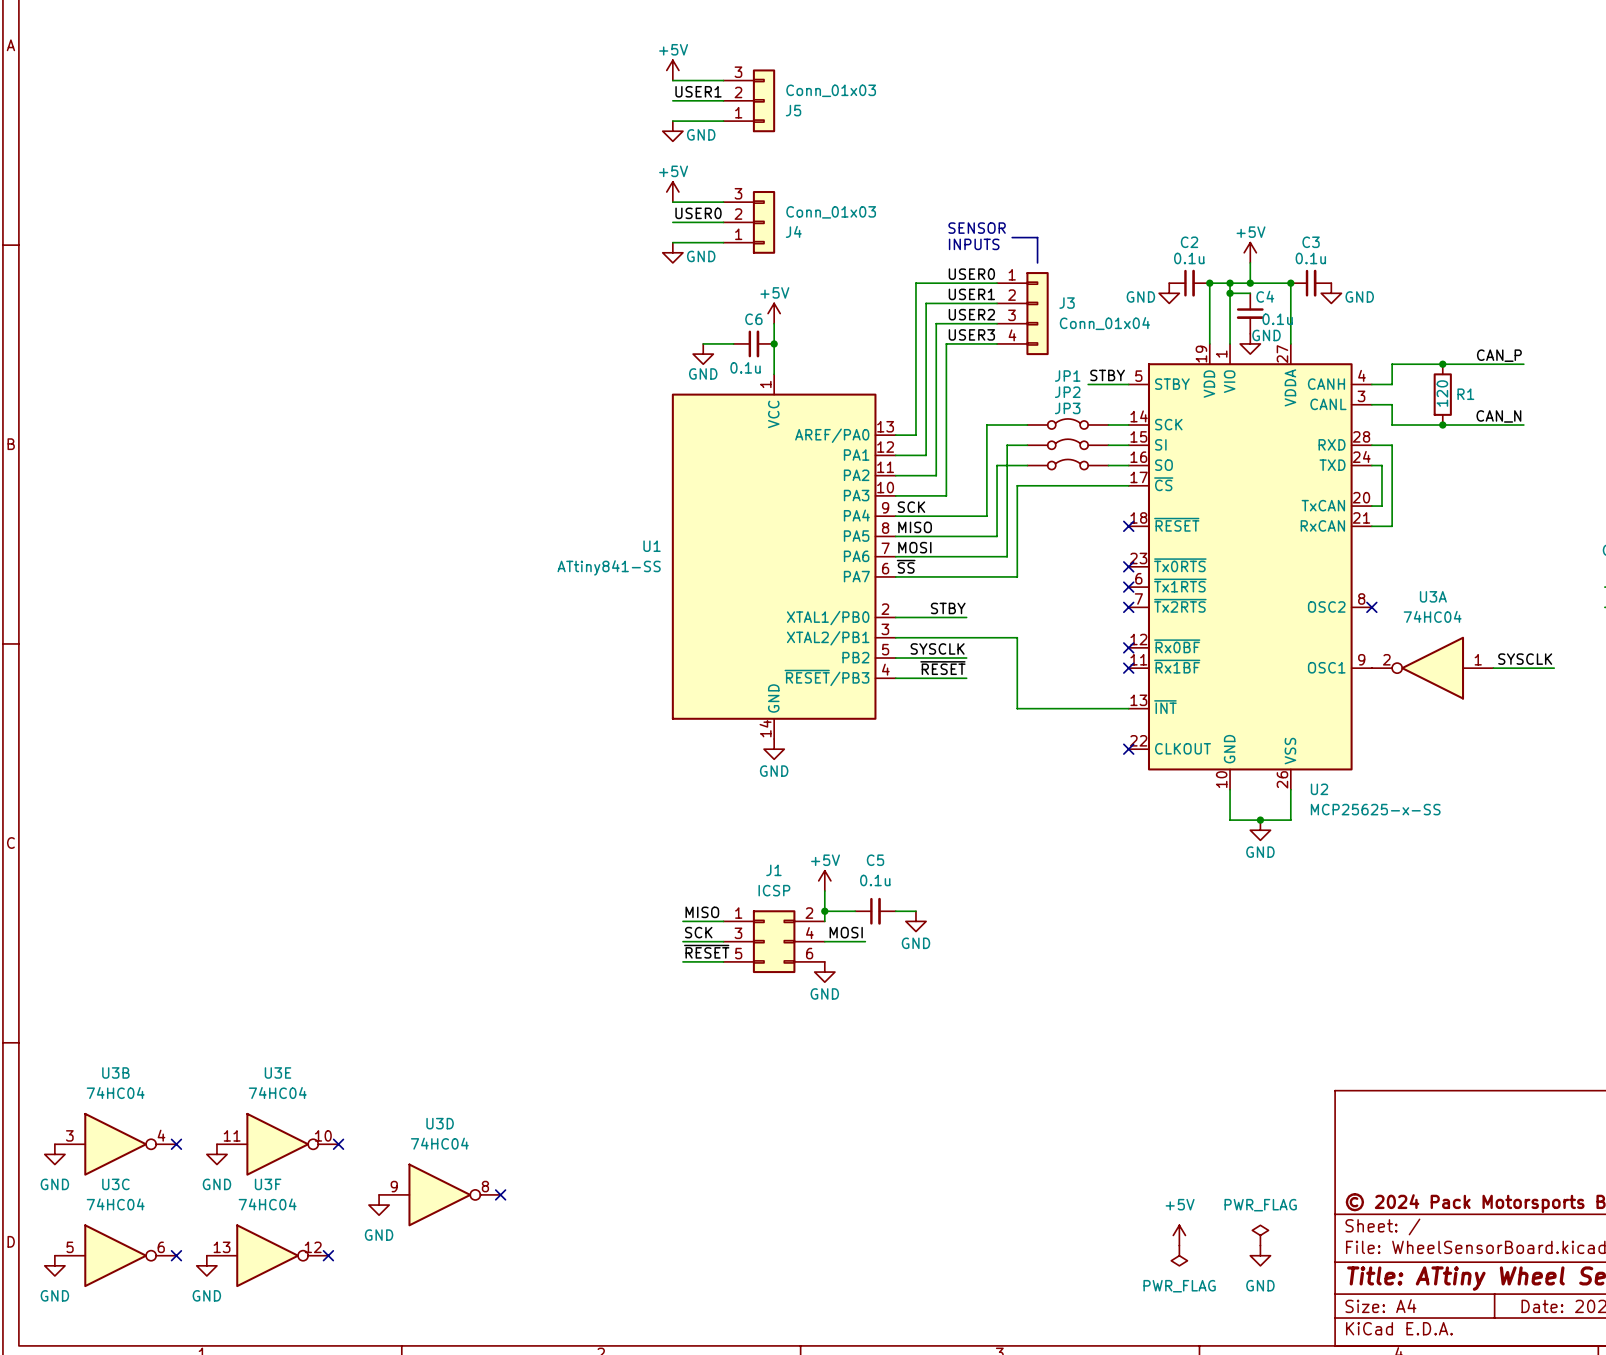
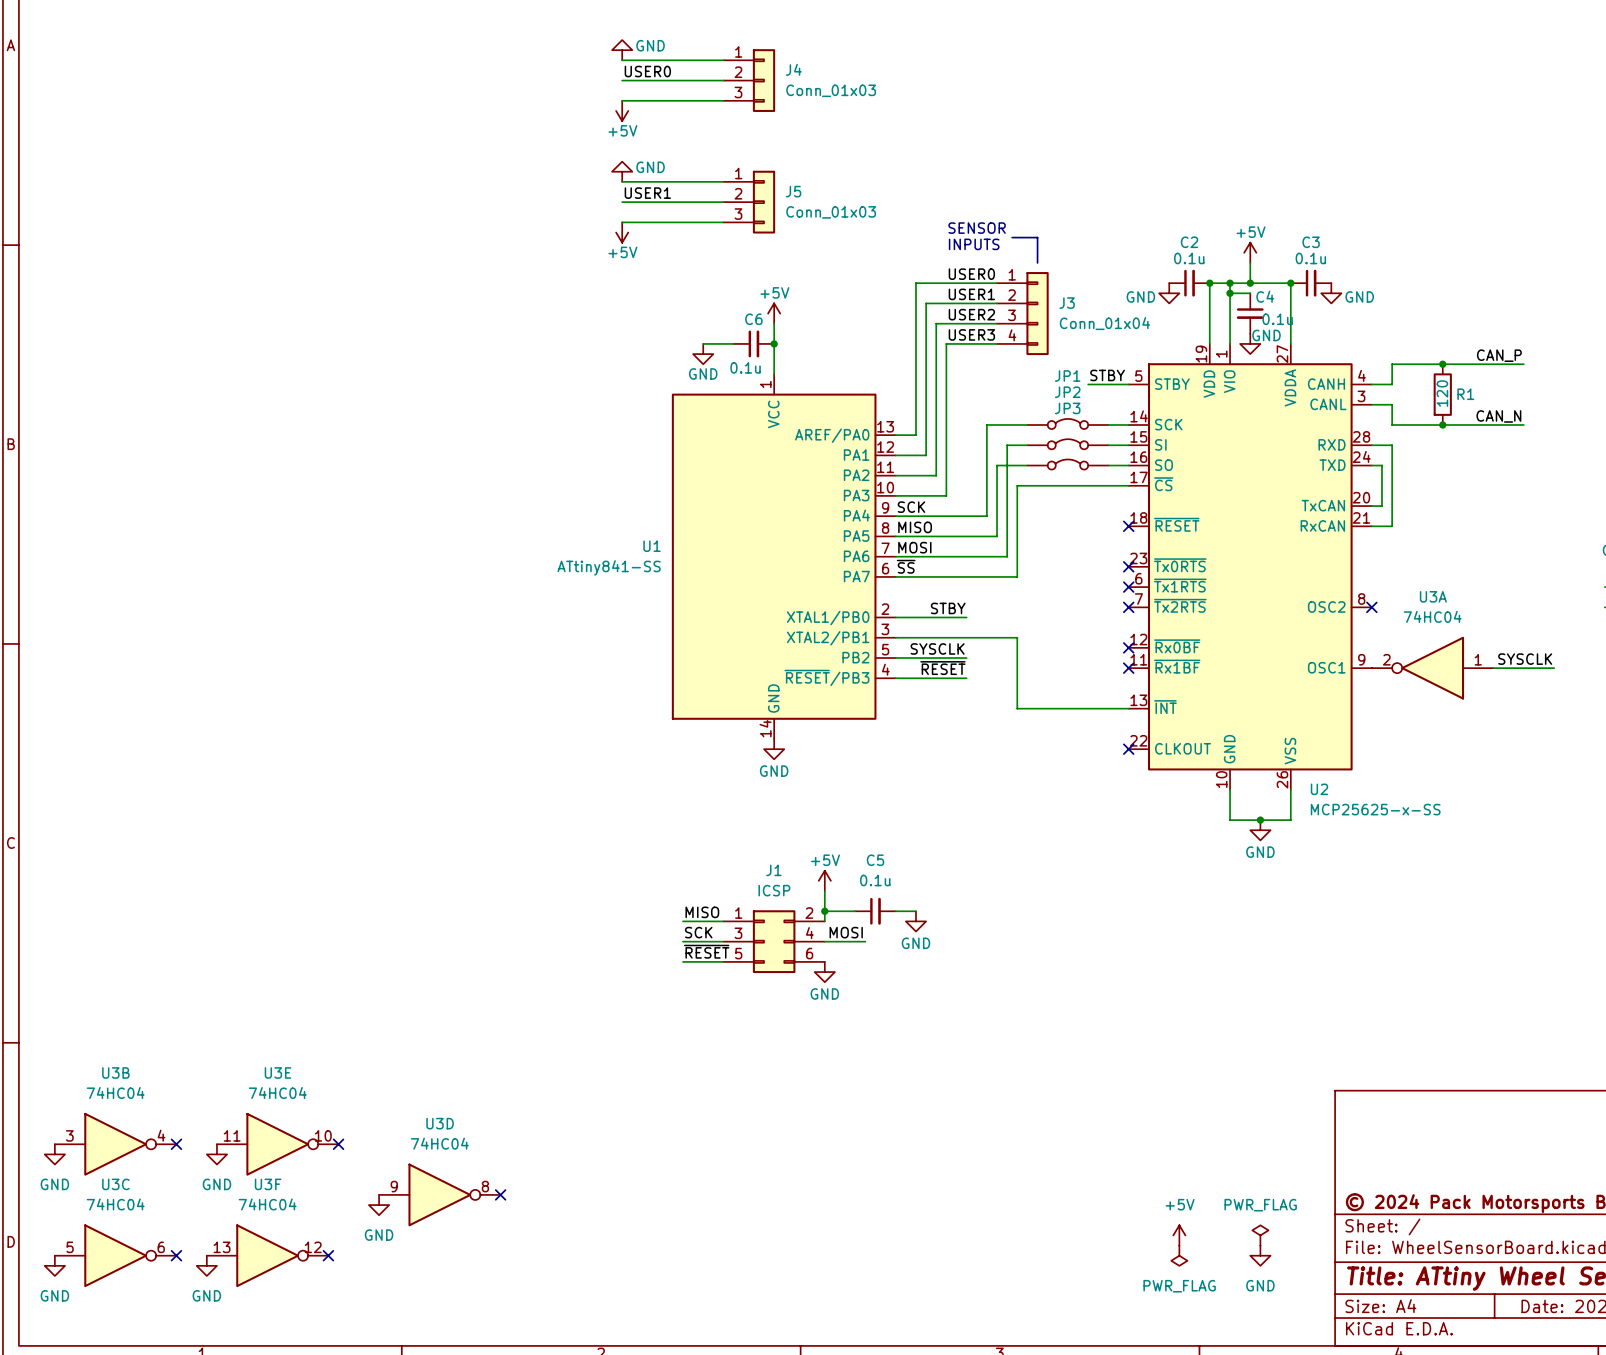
power symbol: none -> GND (622, 50)
wire: none -> (622, 60) (723, 60)
power symbol: +5V (672, 70) -> none
wire: none -> (622, 80) (672, 80)
label position: USER1 (698, 91) -> USER1 (647, 193)
J5 position: (749, 100) -> (749, 202)
J5 flip: as is (764, 100) -> up-down (764, 202)
power symbol: none -> +5V (622, 110)
wire: (672, 121) (723, 121) -> (622, 100) (672, 100)
power symbol: GND (672, 131) -> none
power symbol: none -> GND (622, 171)
wire: none -> (622, 181) (723, 181)
power symbol: +5V (672, 192) -> none
wire: none -> (622, 202) (672, 202)
label position: USER0 (698, 213) -> USER0 (647, 71)
J4 position: (749, 222) -> (749, 80)
J4 flip: as is (764, 222) -> up-down (764, 80)
power symbol: none -> +5V (622, 232)
wire: (672, 242) (723, 242) -> (622, 222) (672, 222)
power symbol: GND (672, 252) -> none

